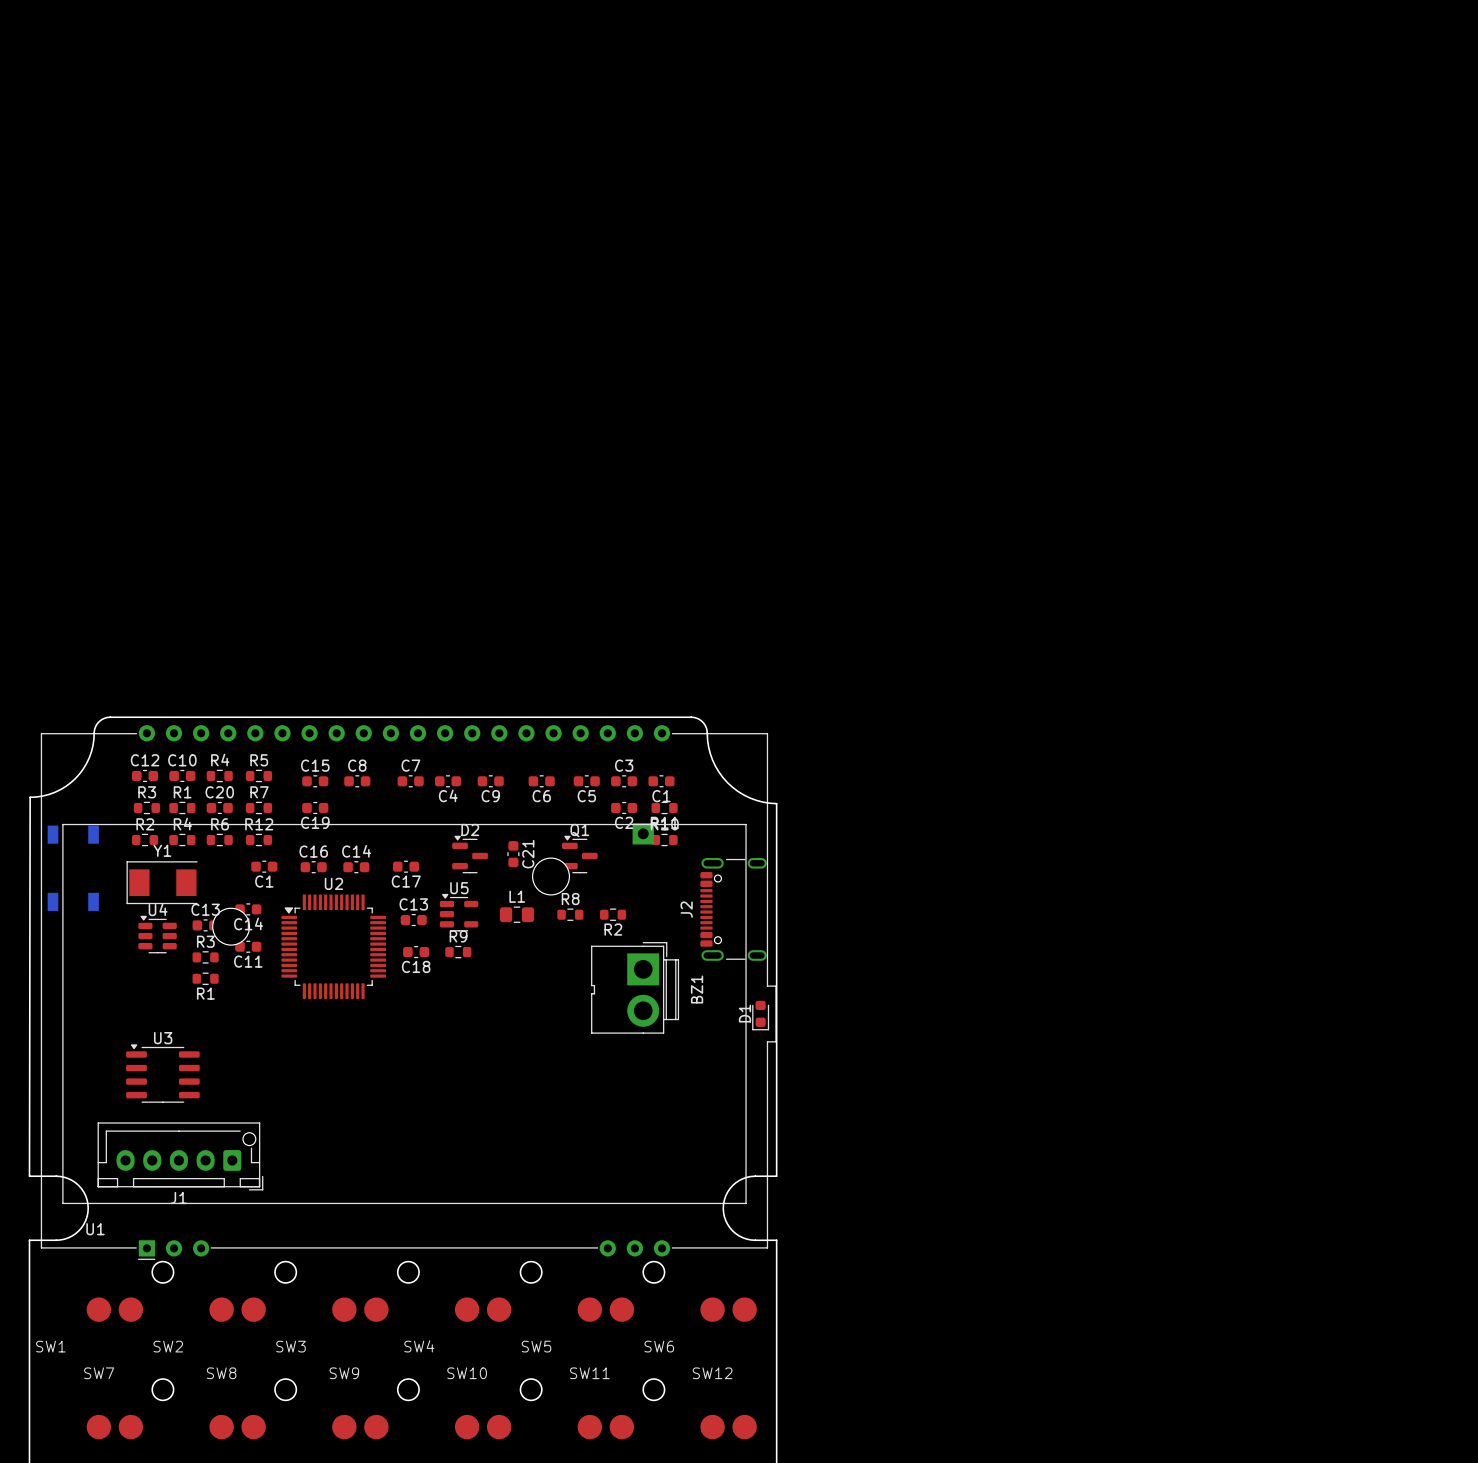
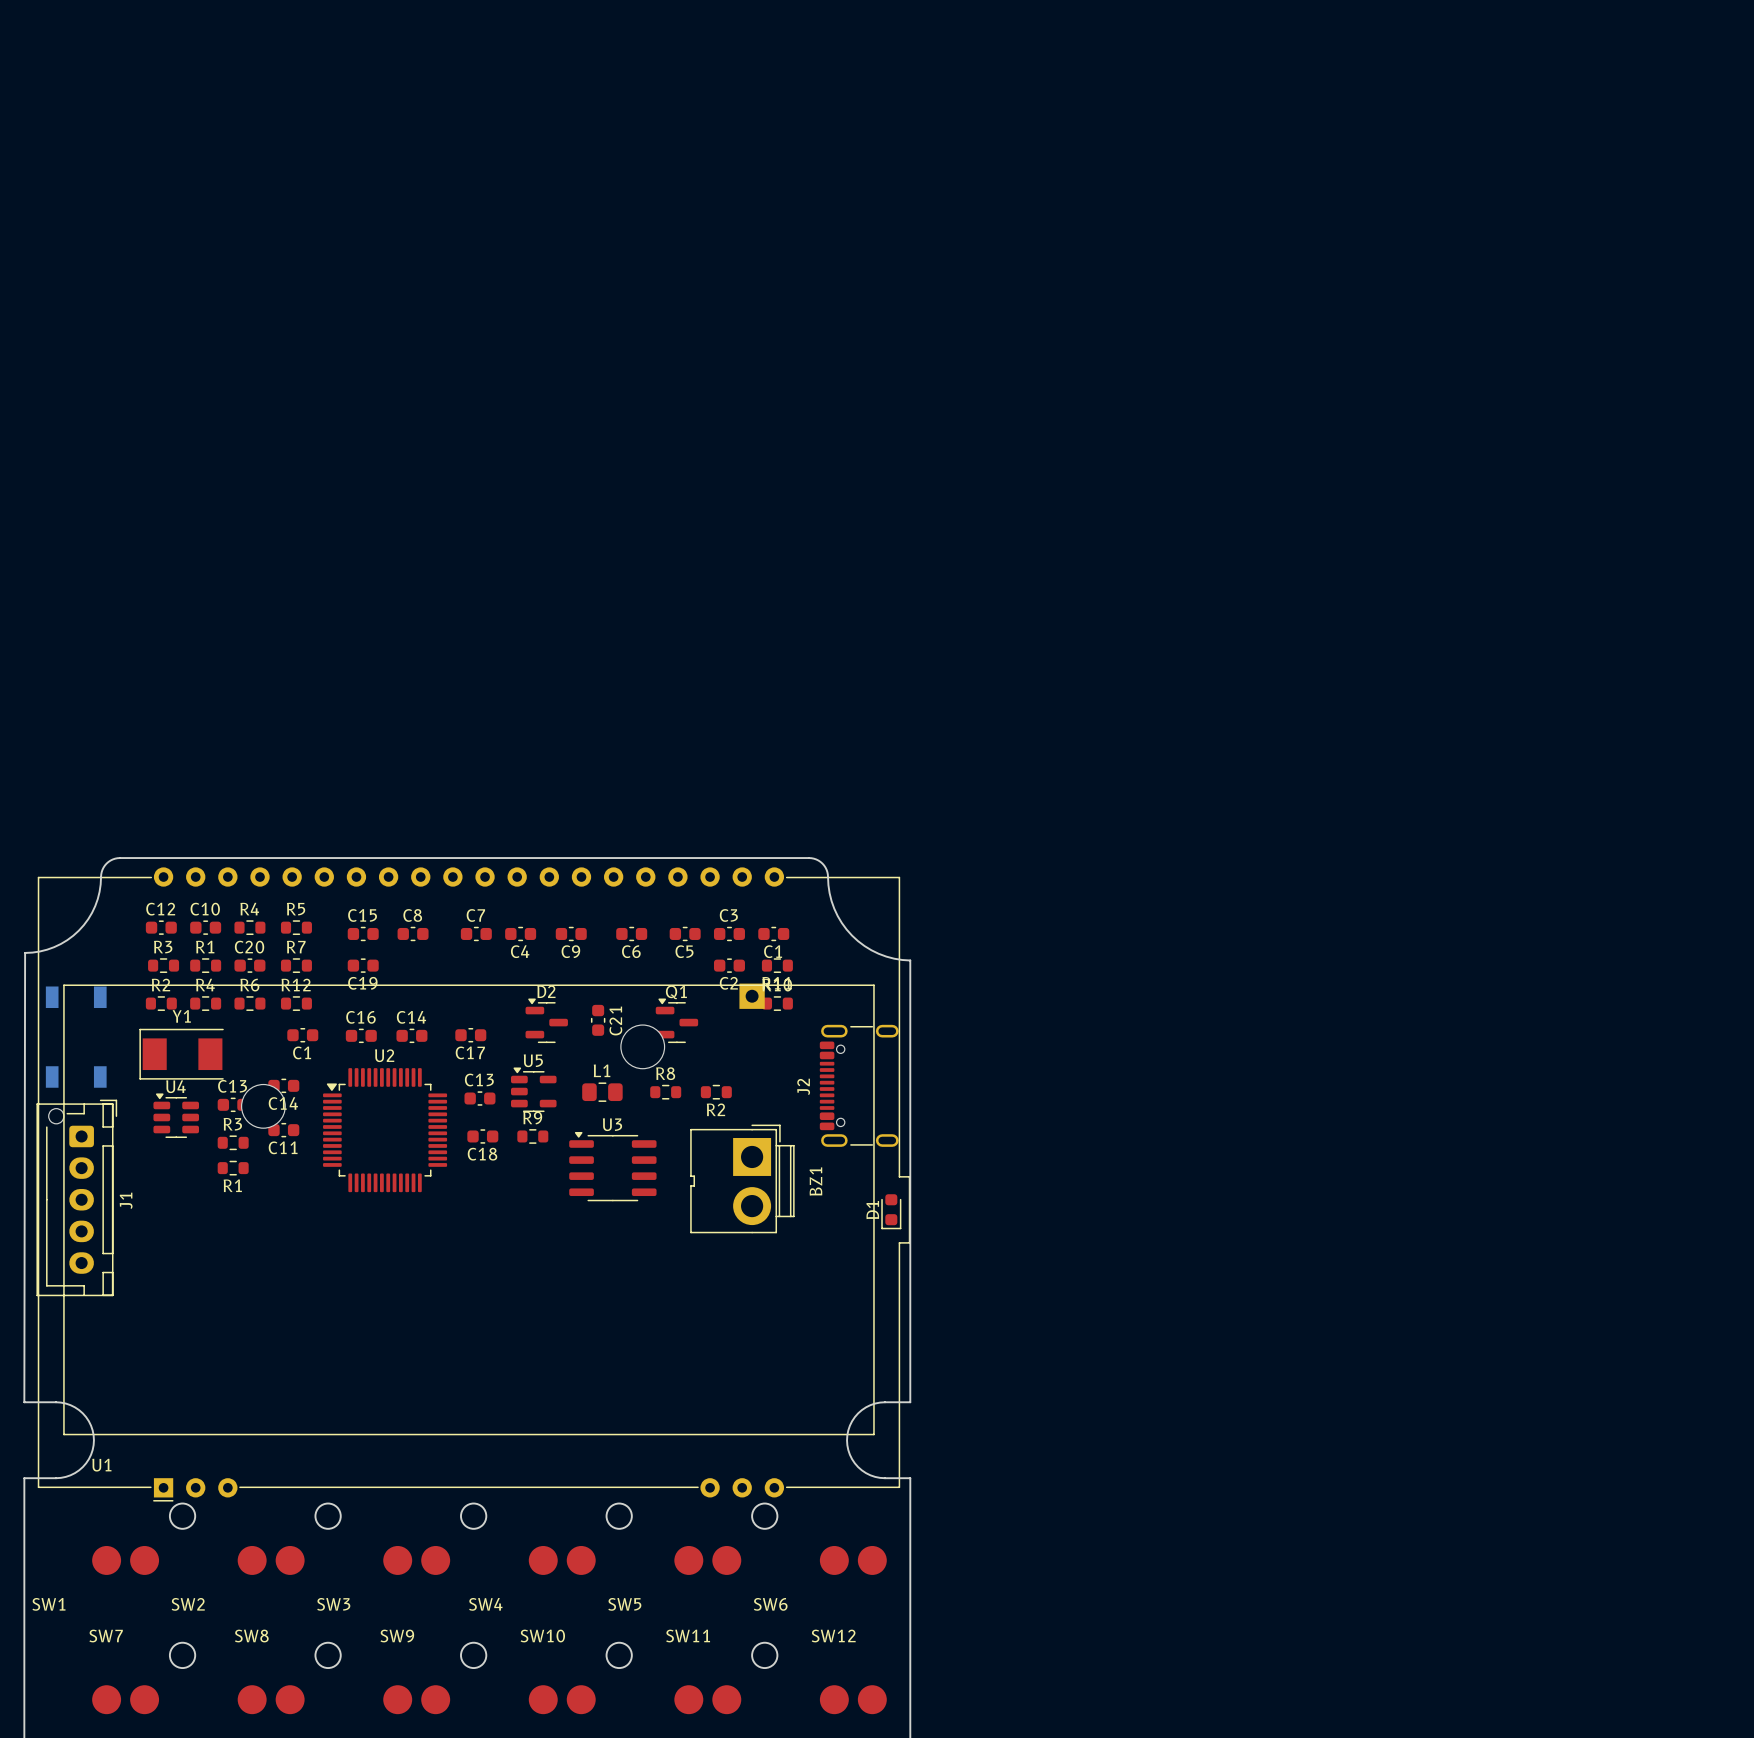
U3 position: (162, 1073) -> (612, 1166)
J1 rotation: 0° (180, 1156) -> 90° counterclockwise (76, 1197)
J1 position: (180, 1156) -> (76, 1197)

